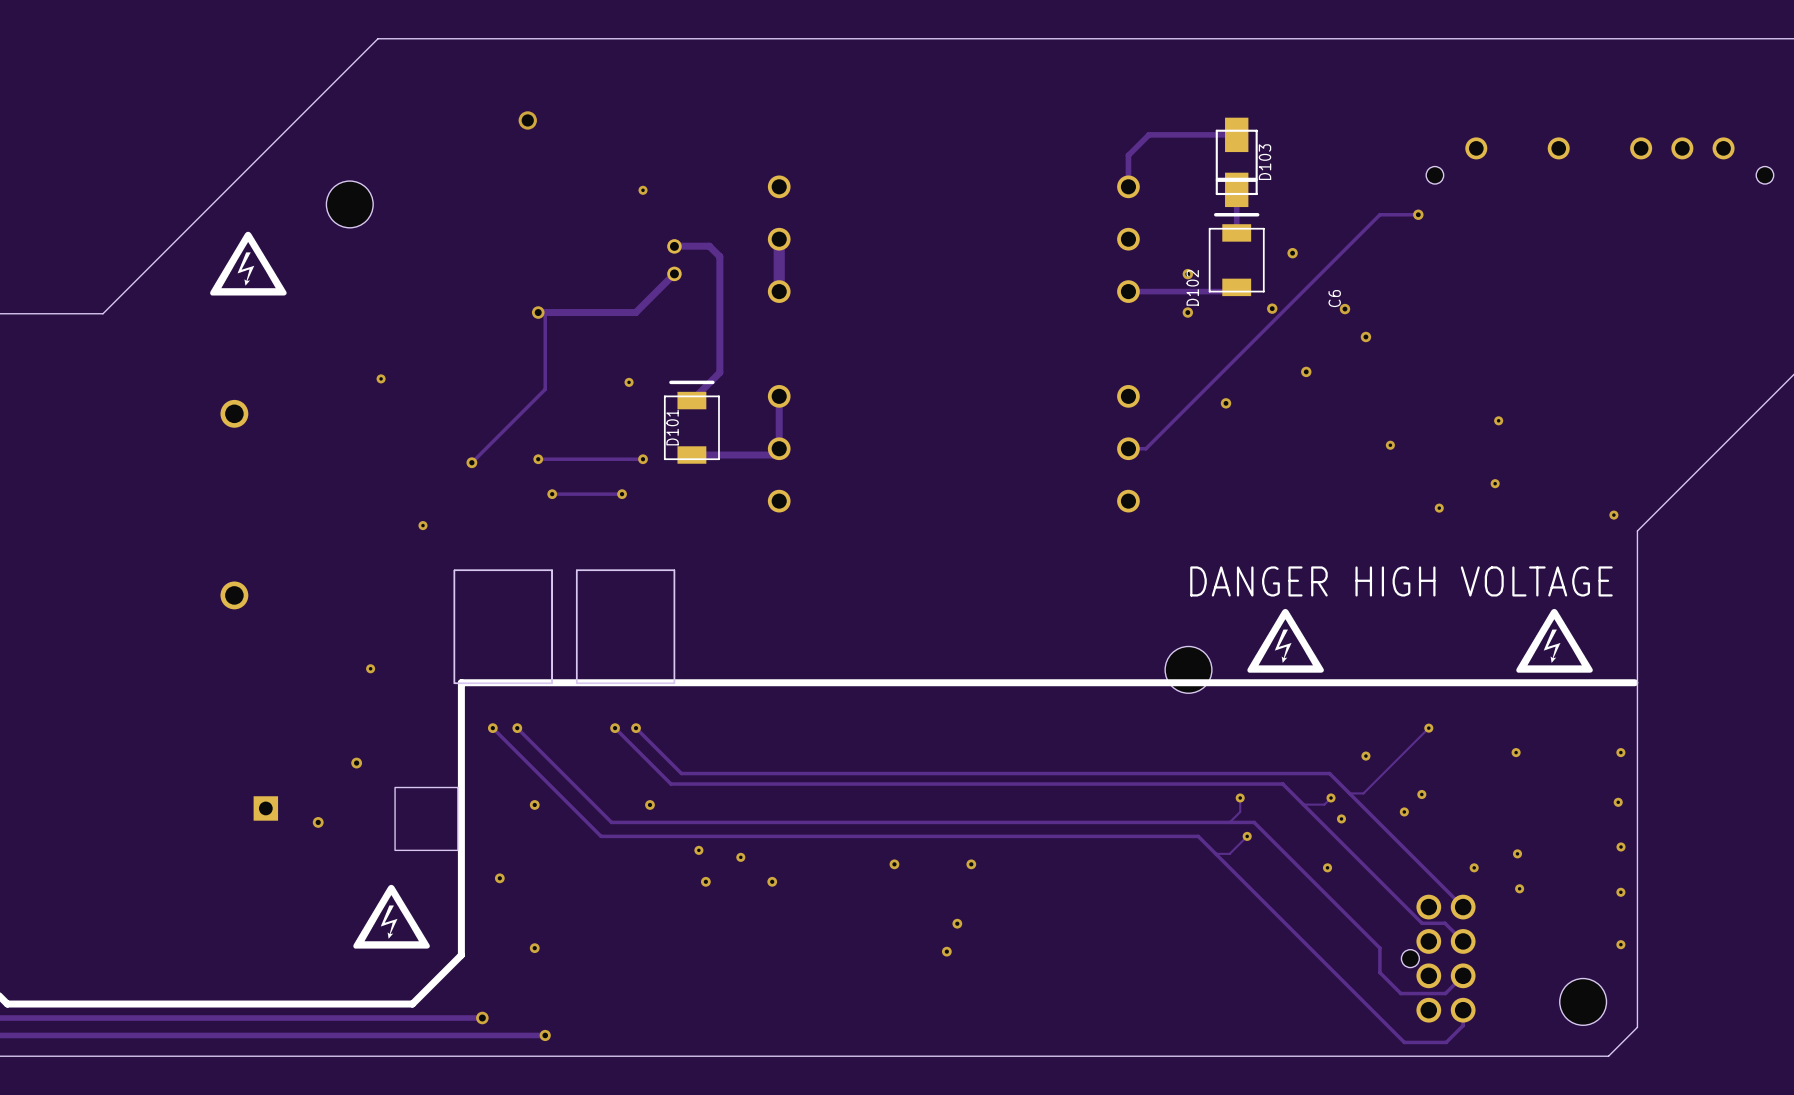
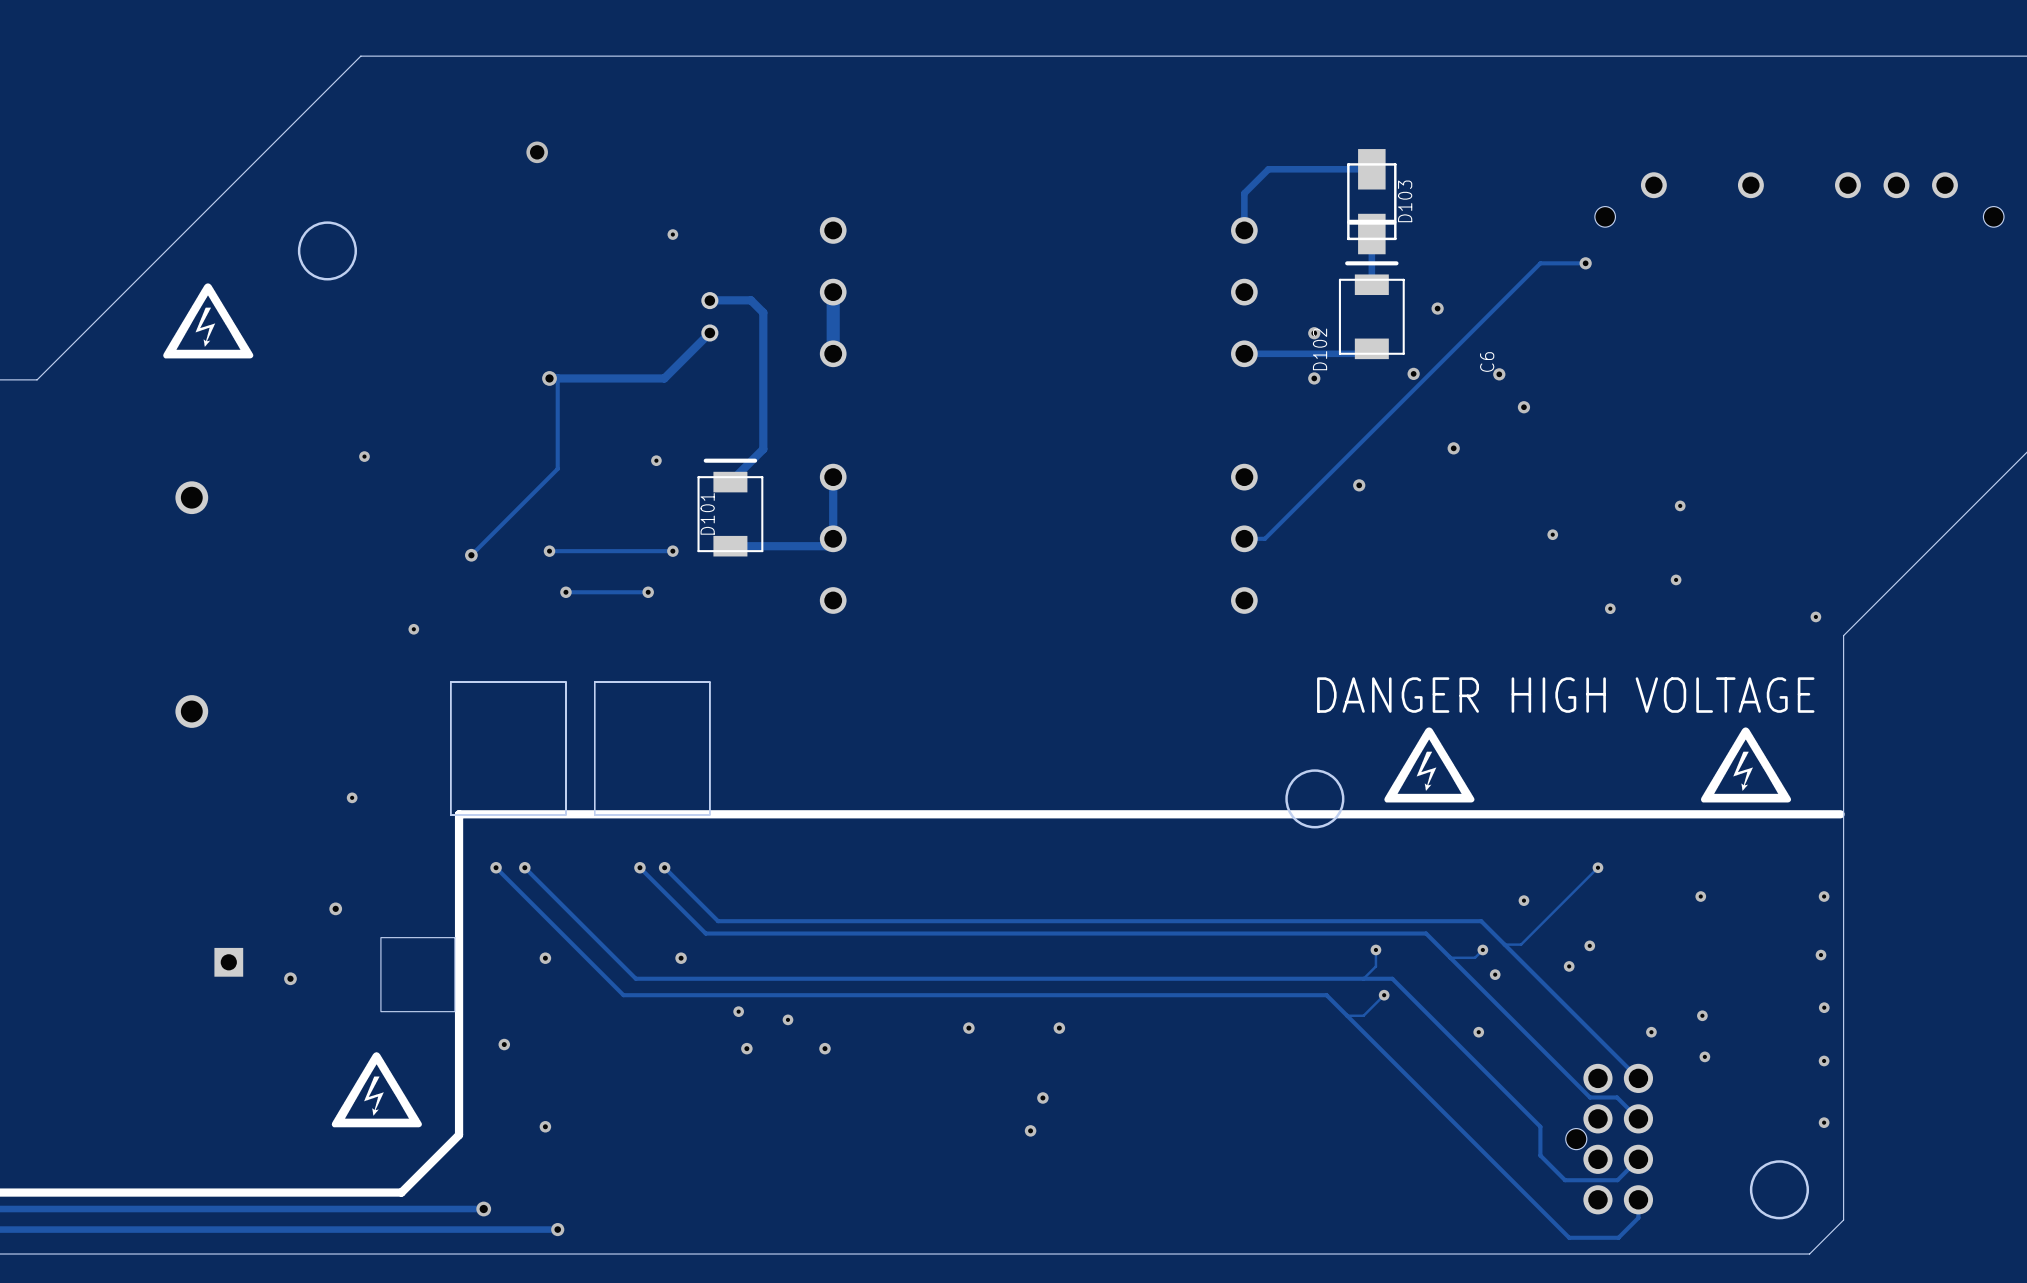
round board edge: none -> [297, 221, 357, 281]
part: (349, 204) -> none
round board edge: none -> [1285, 769, 1345, 829]
part: (1188, 669) -> none
round board edge: none -> [1749, 1160, 1810, 1220]
part: (1583, 1001) -> none

